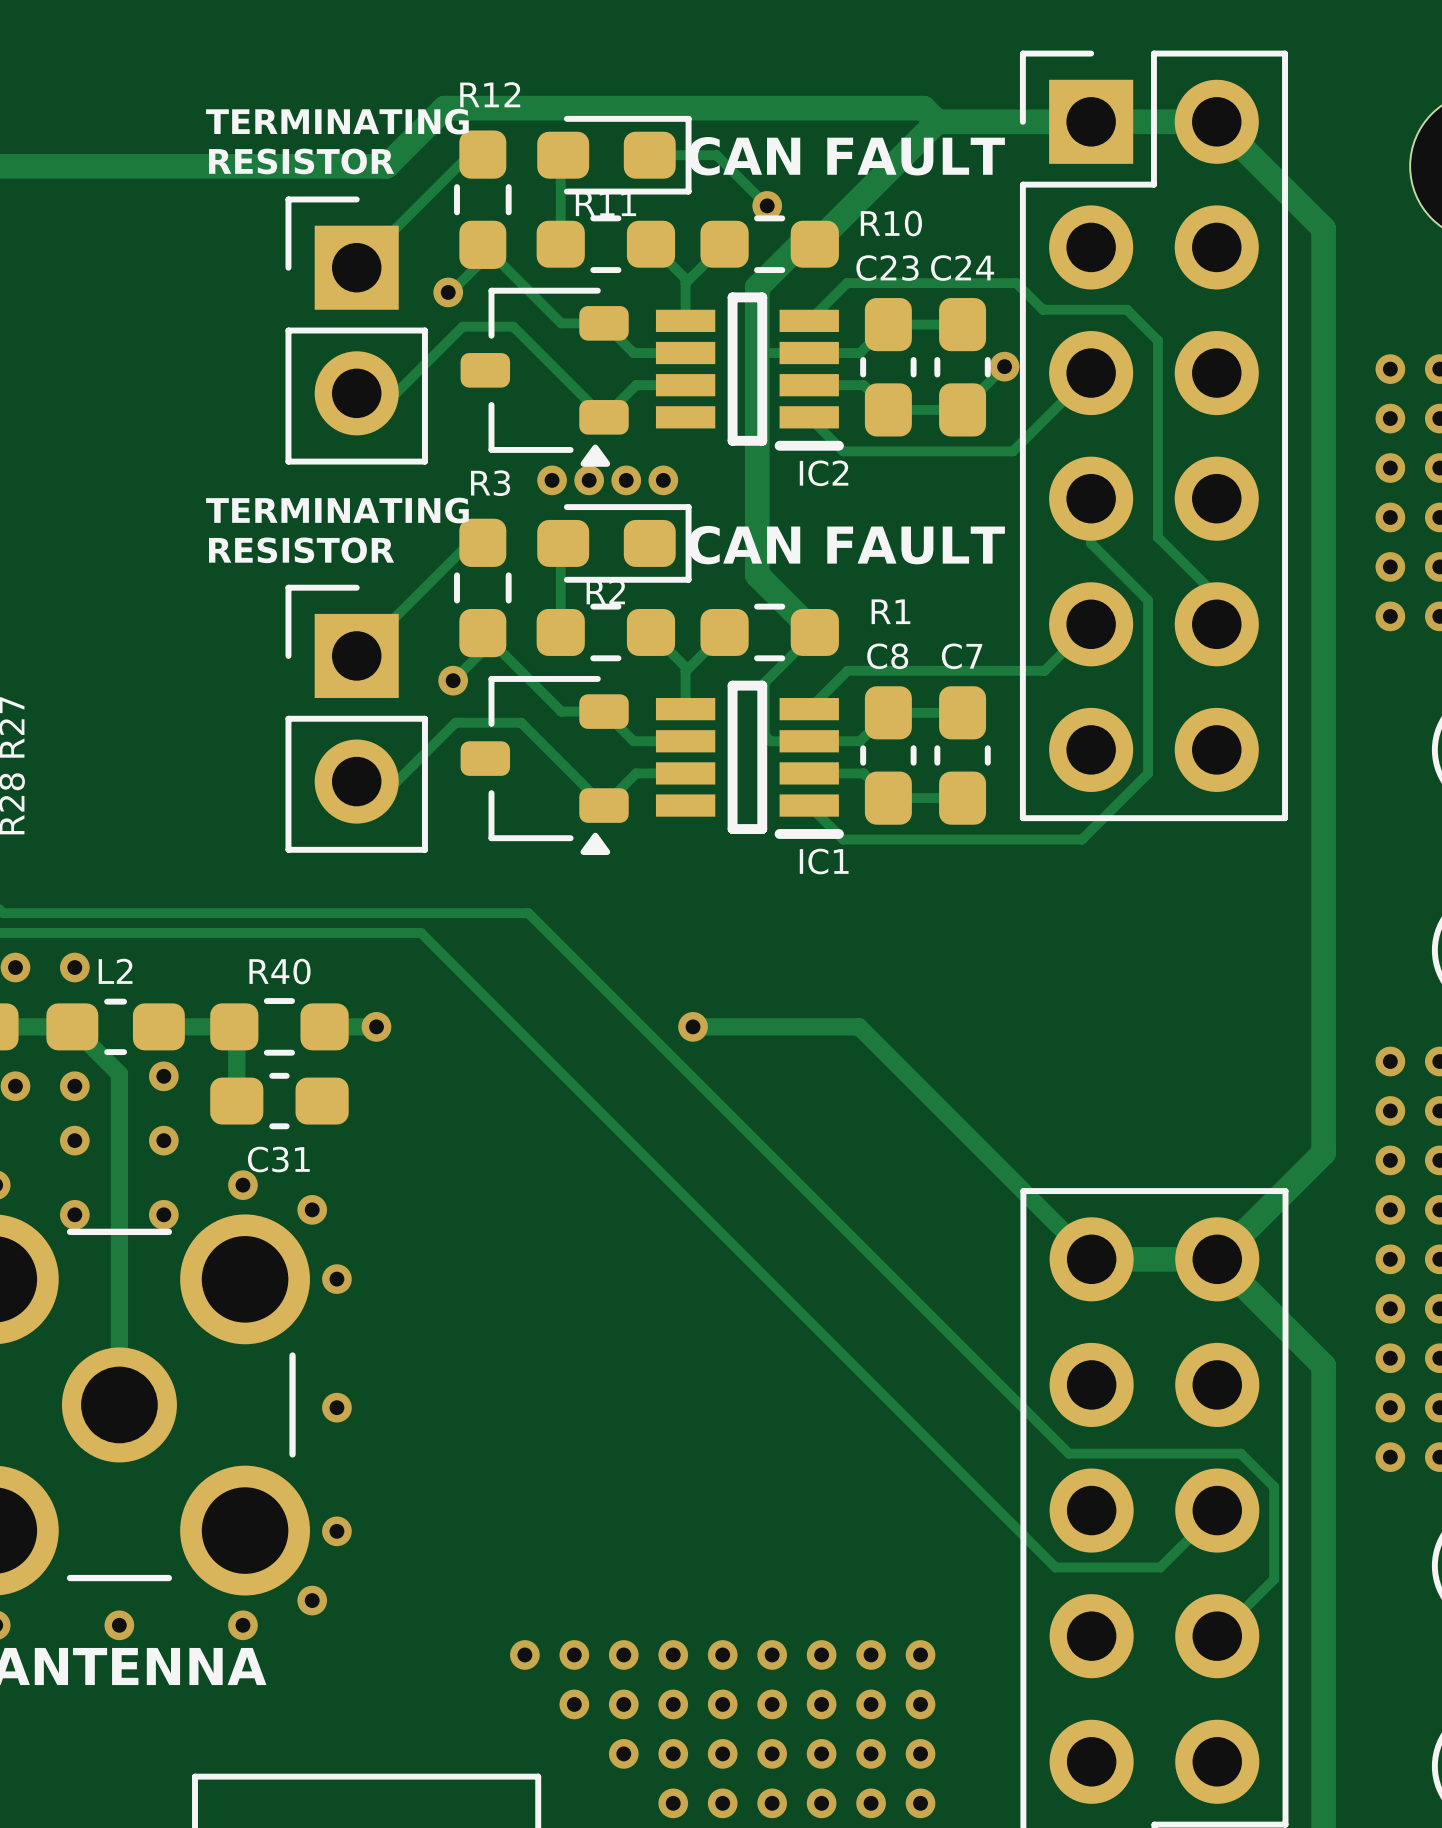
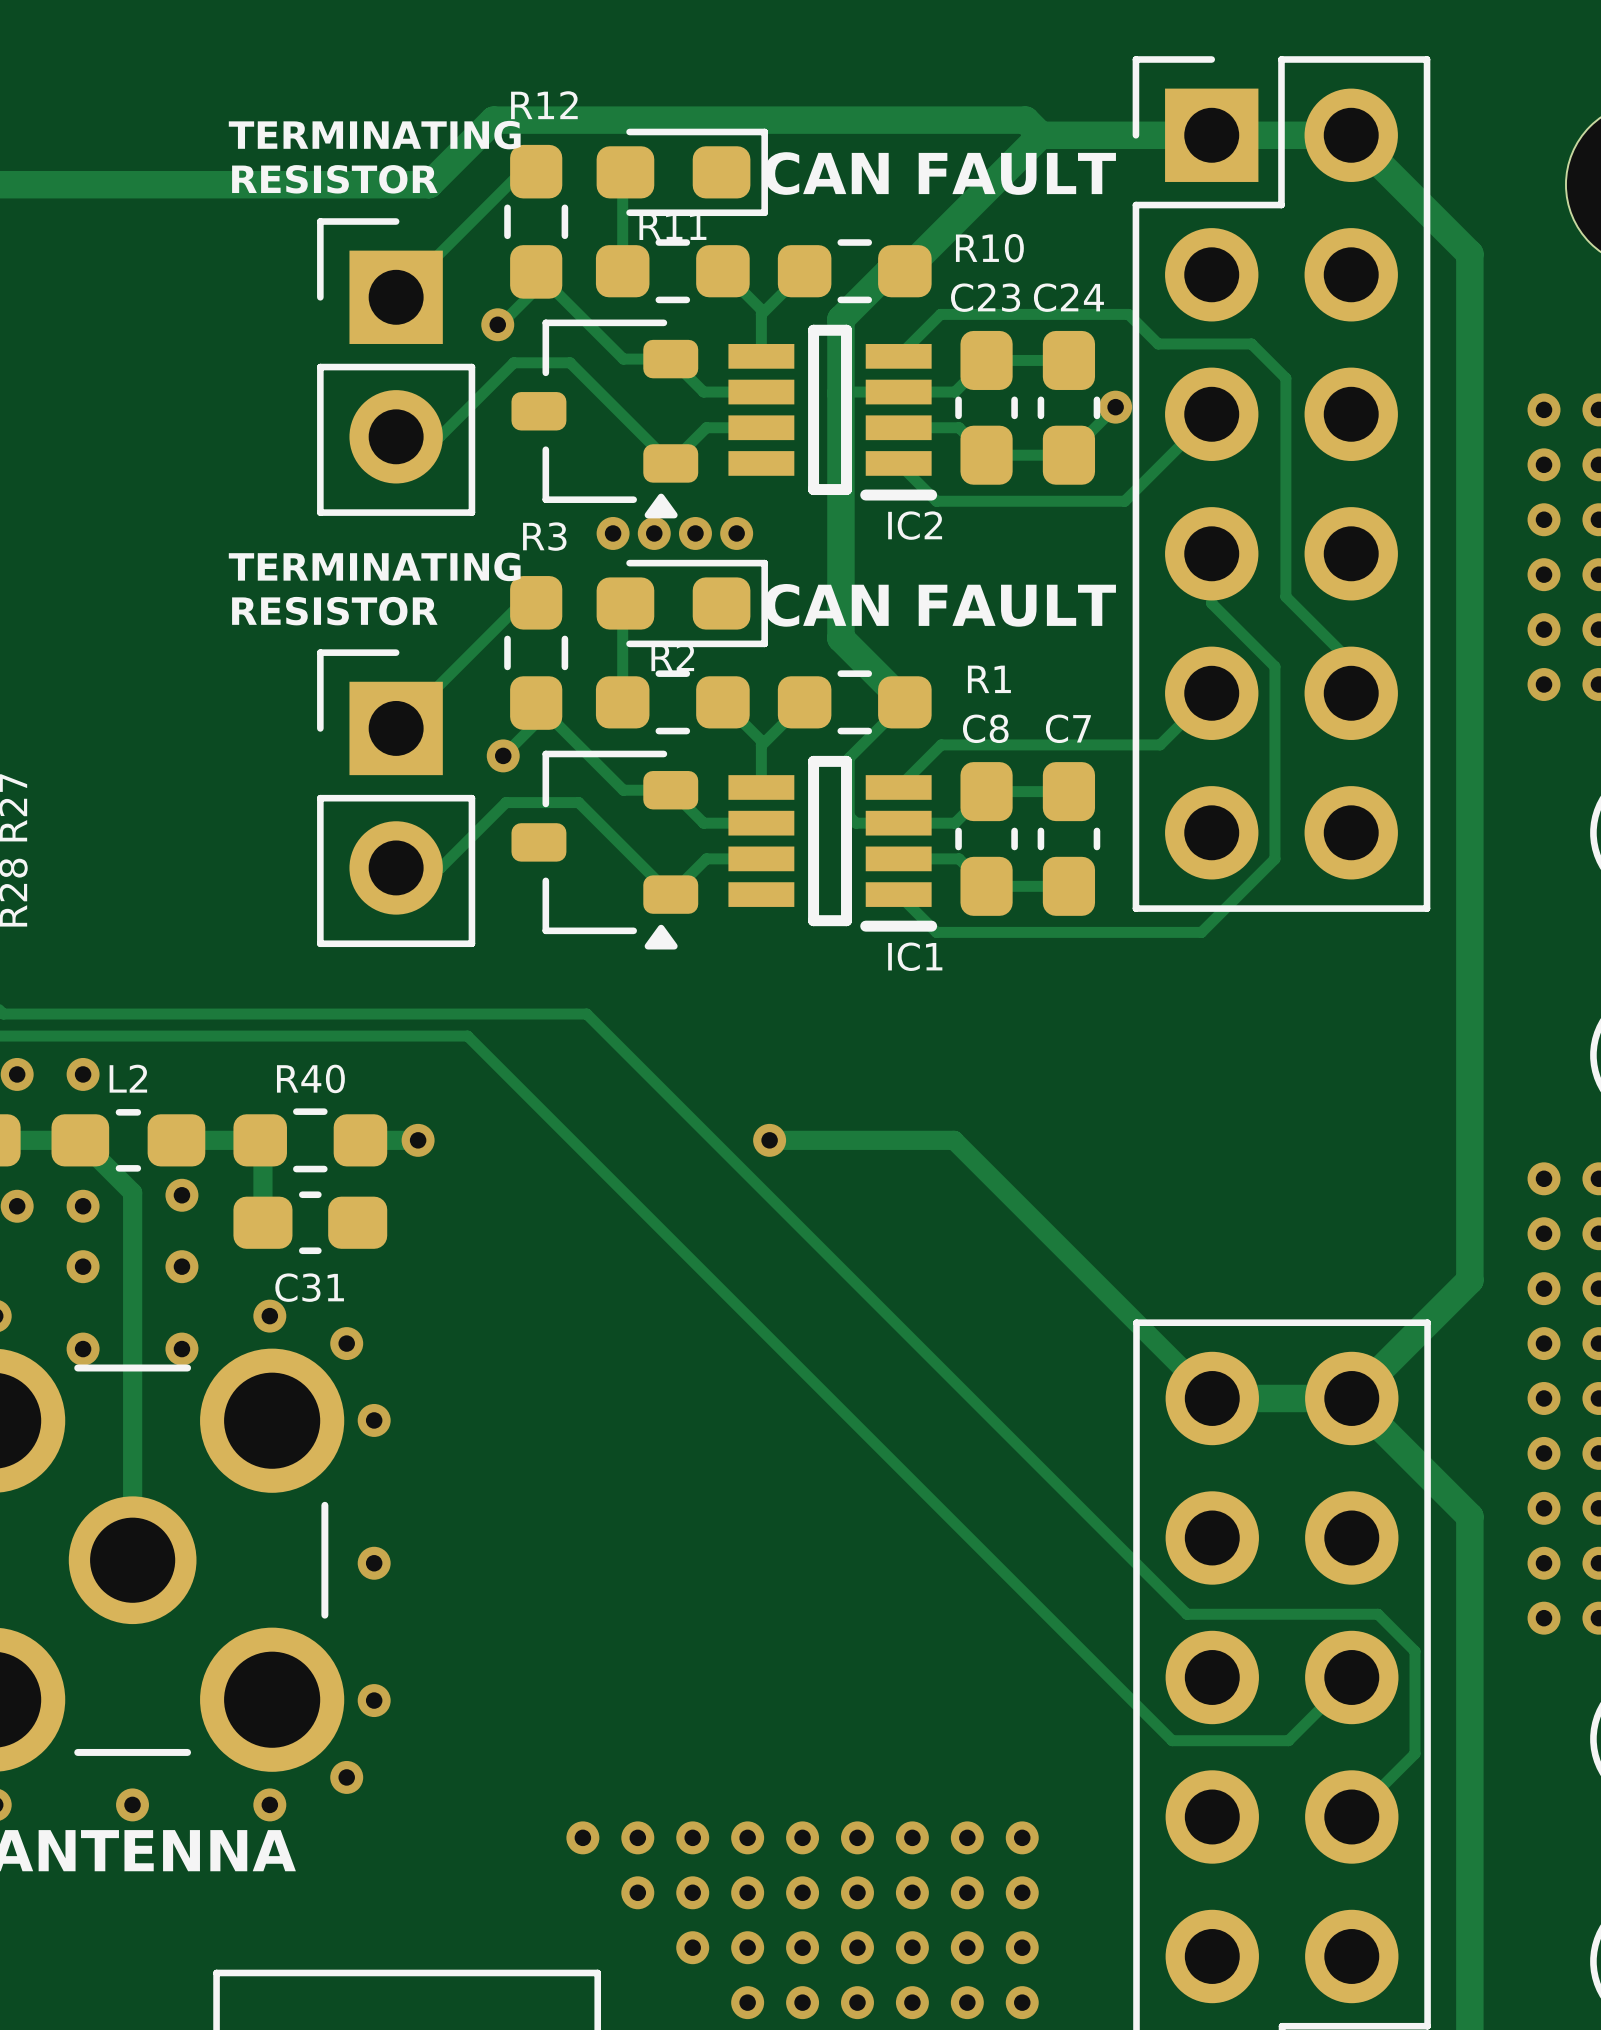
track: (649, 155) (716, 155) (767, 205) -> none
via: (767, 205) -> none

